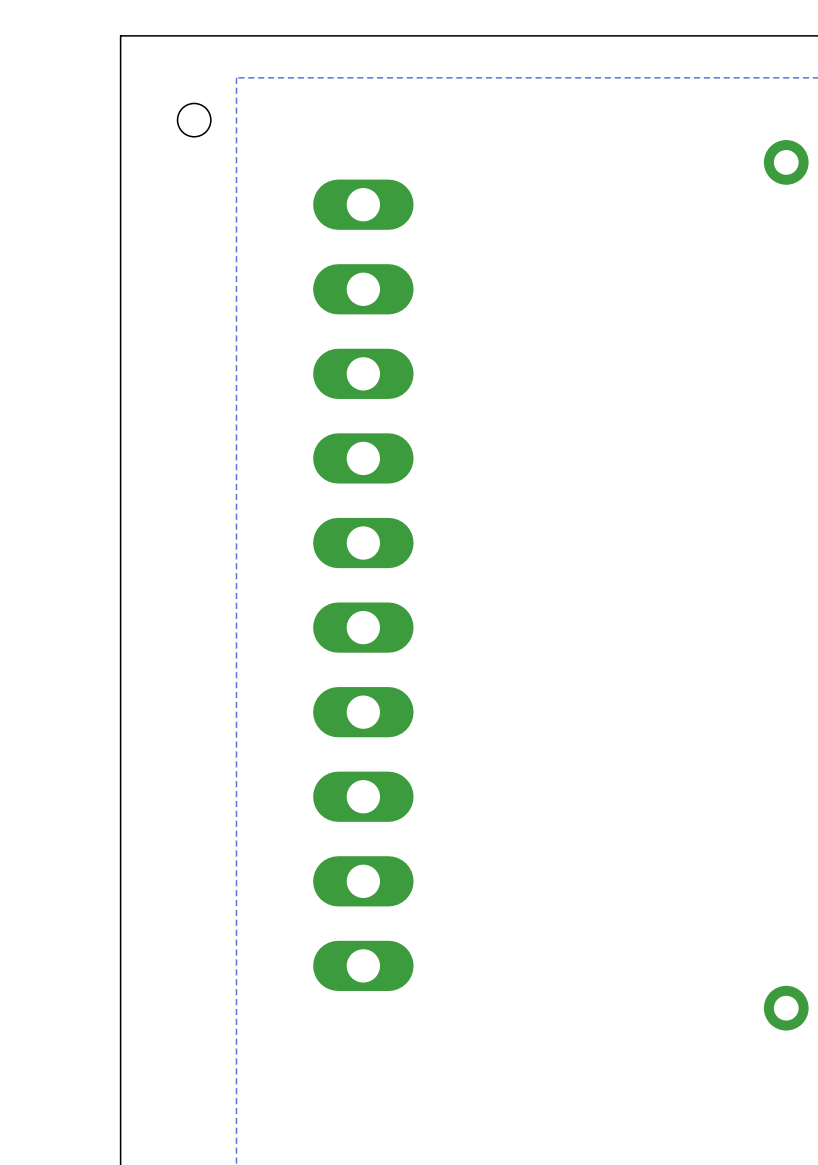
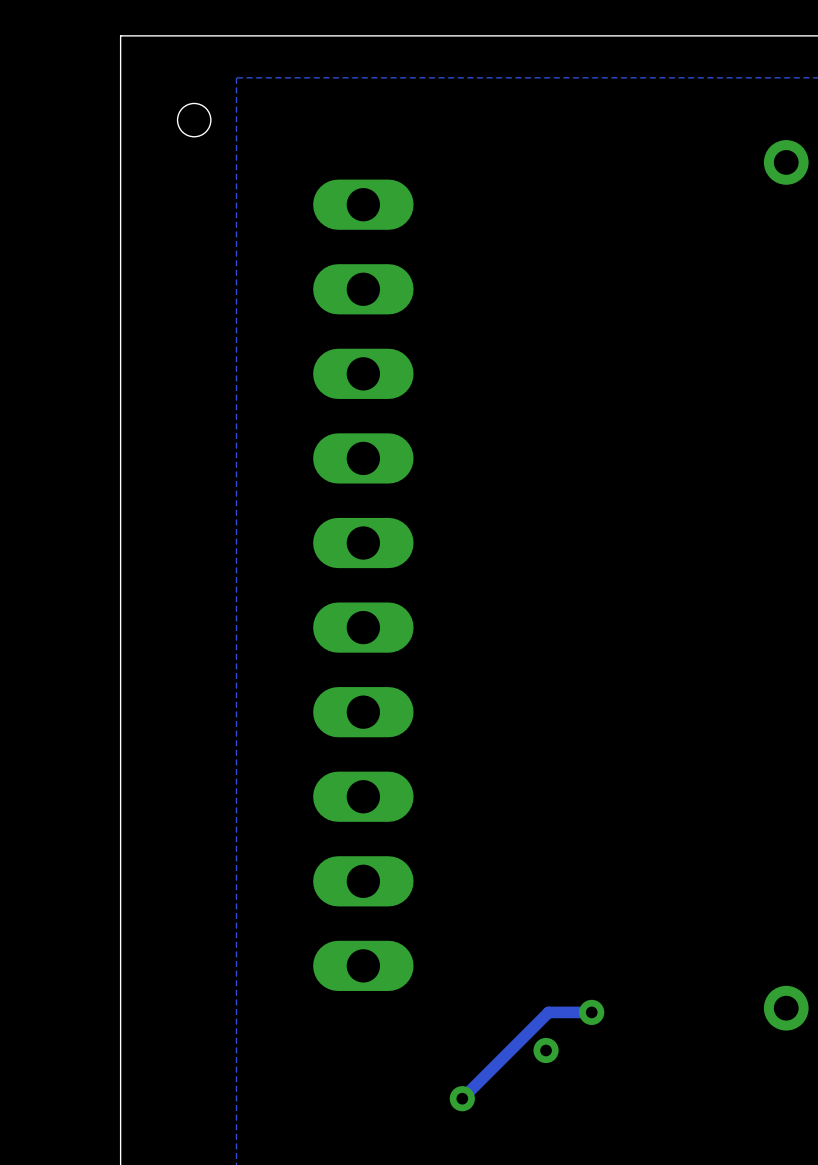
track: none -> (591, 1012) (548, 1012) (462, 1098)
via: none -> (591, 1012)
via: none -> (546, 1050)
via: none -> (462, 1098)

